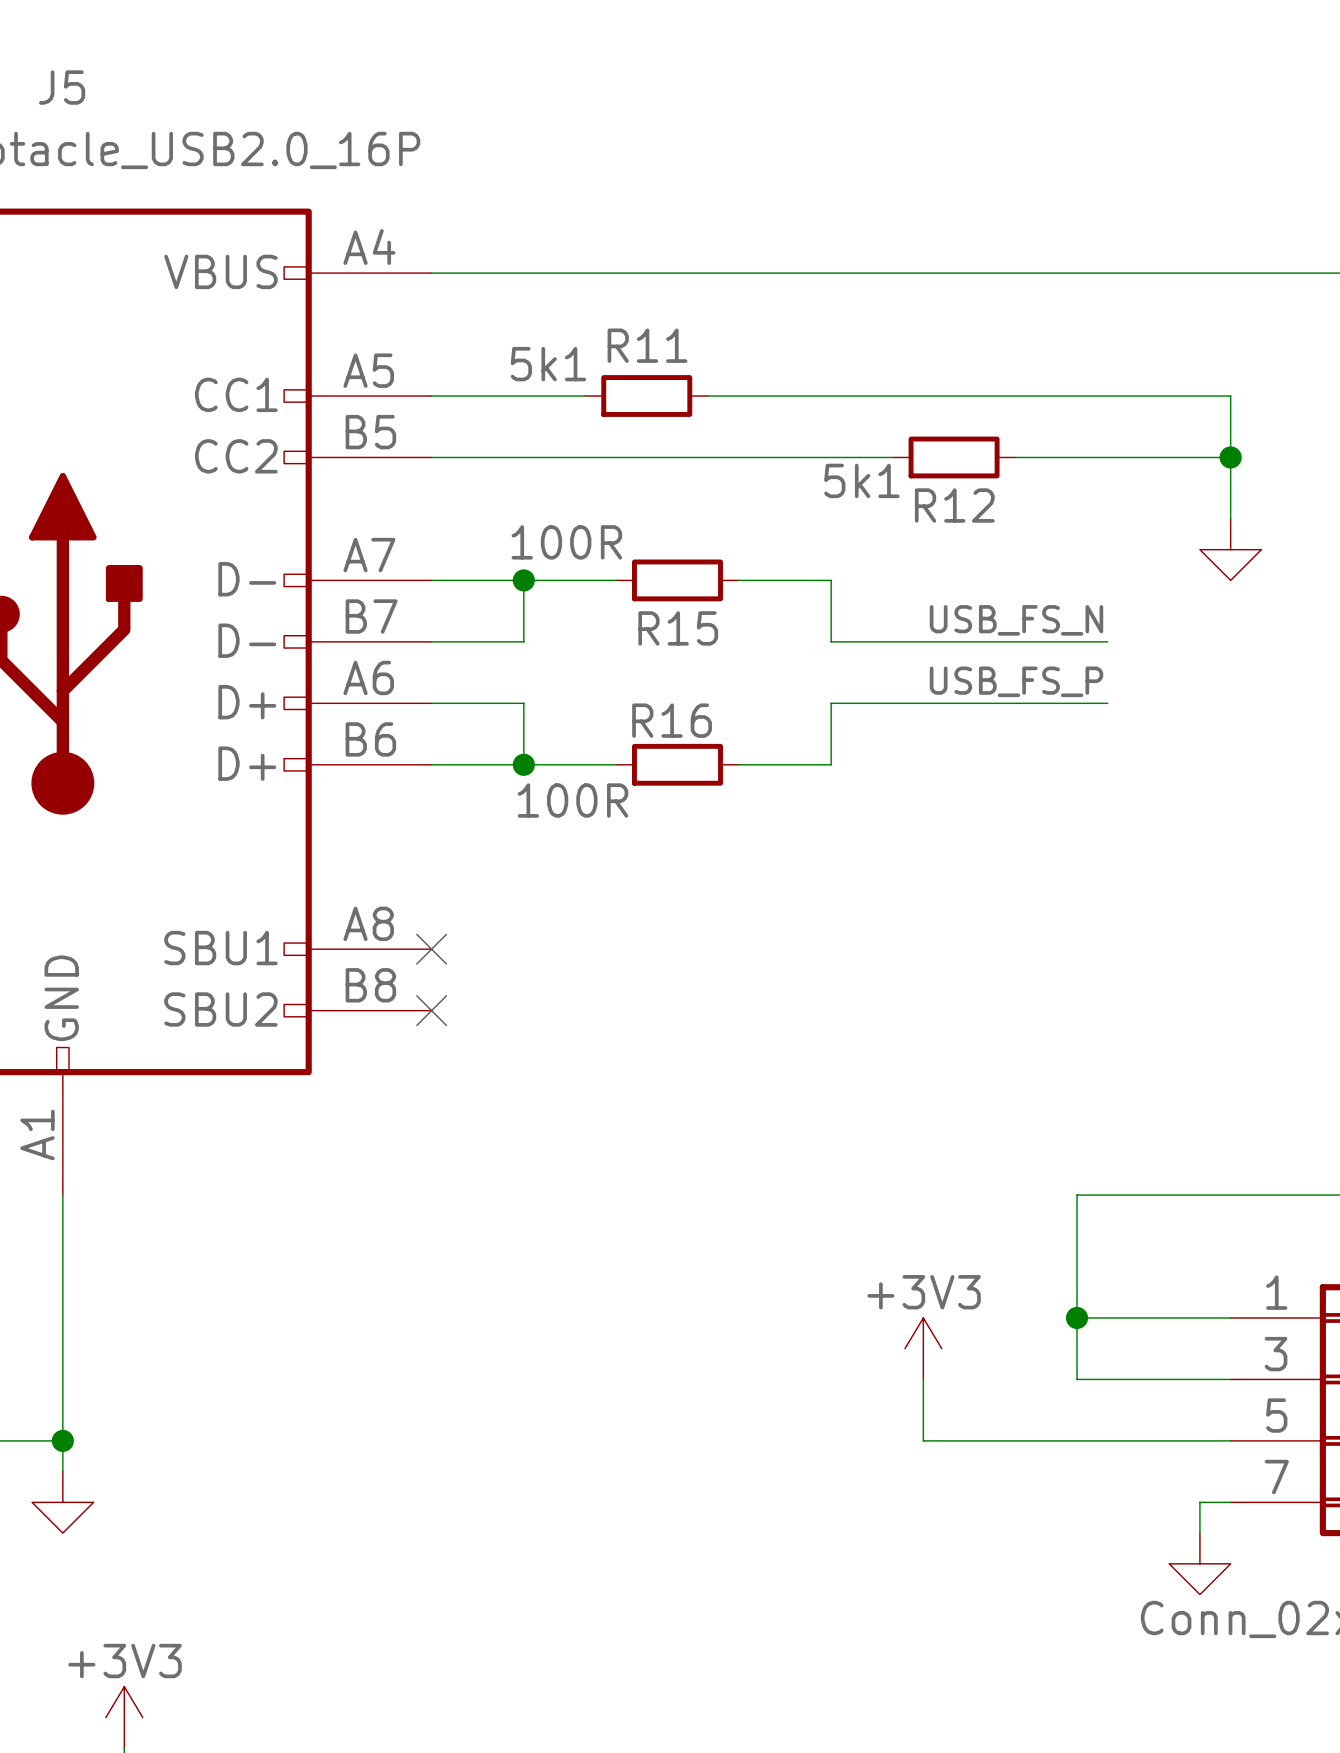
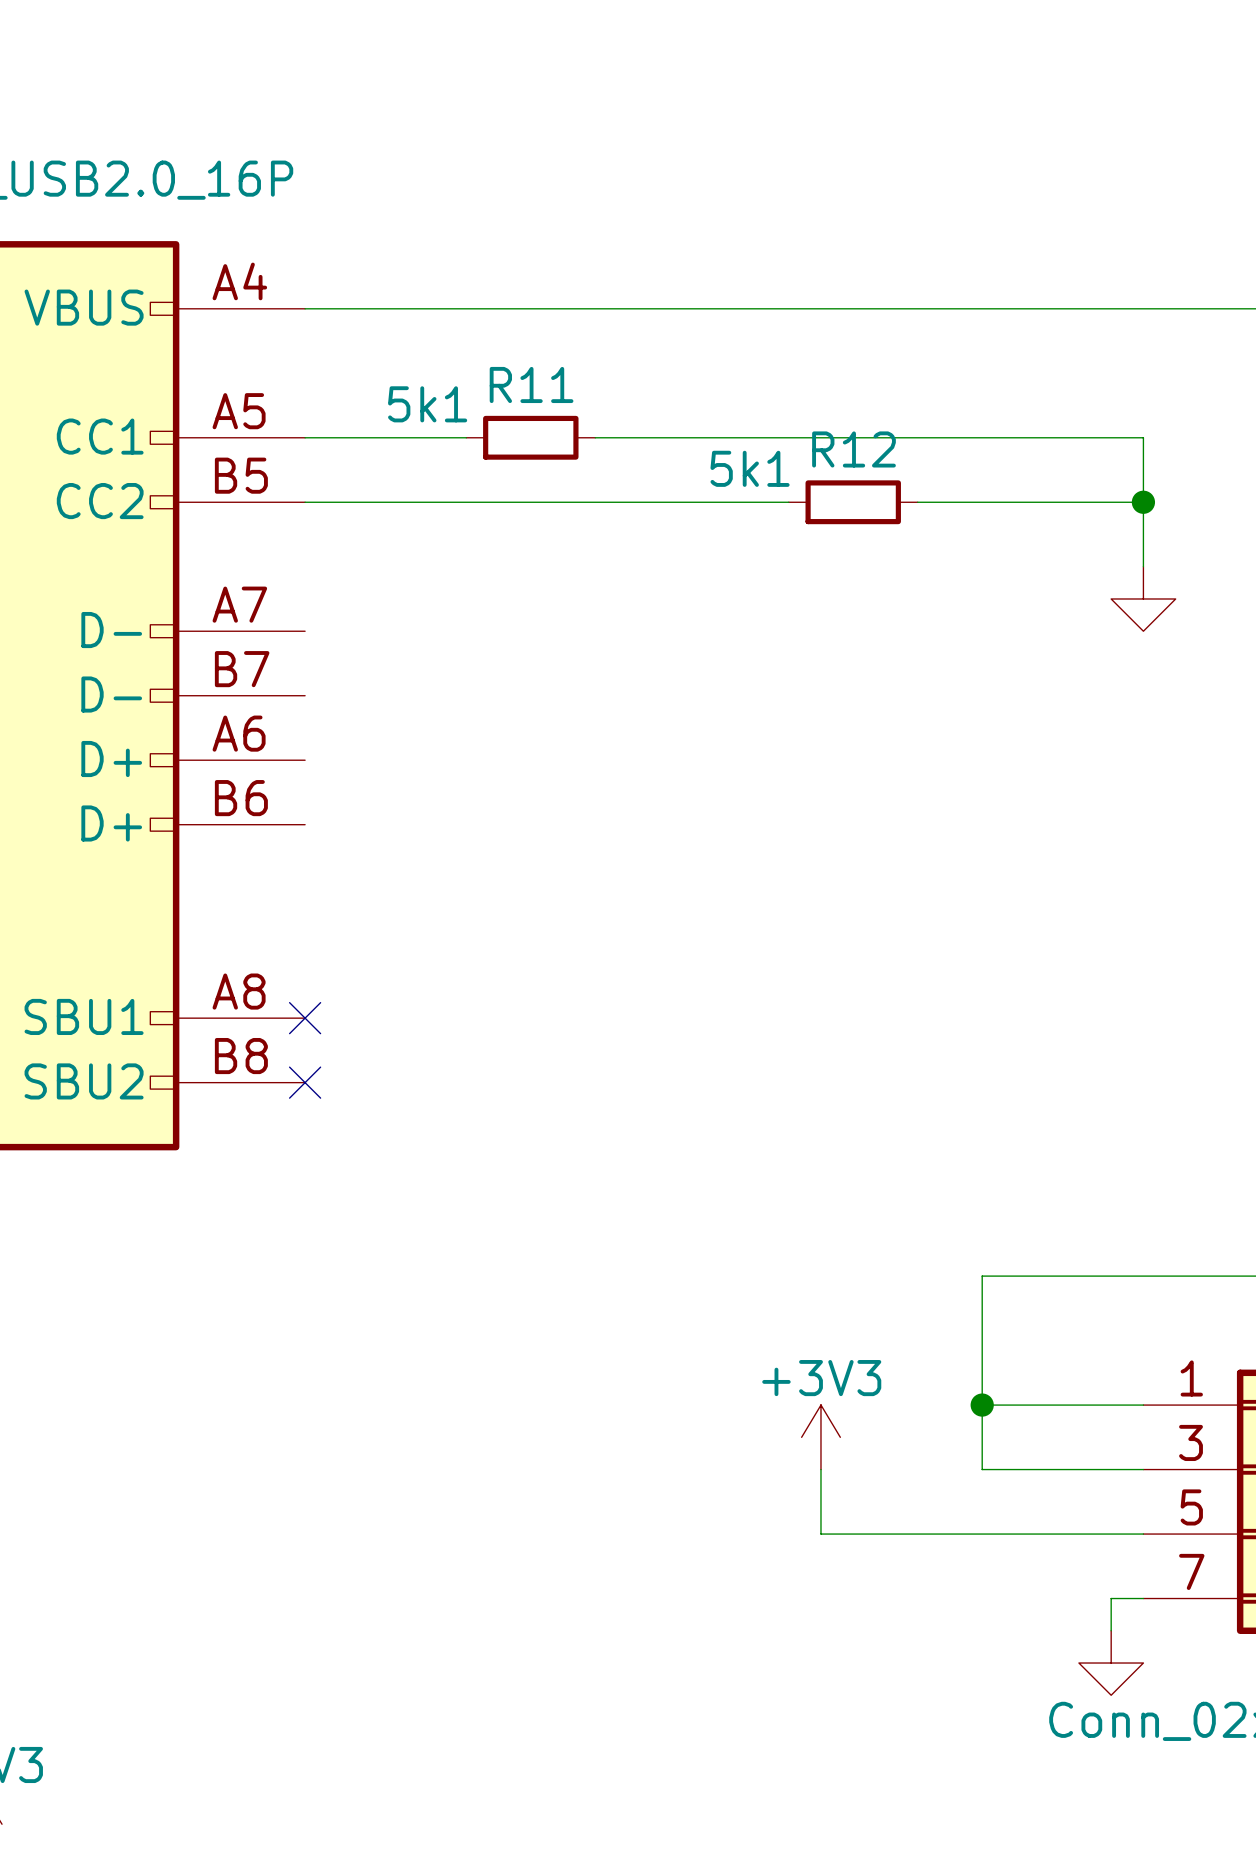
R12 value position: 5k1 (861, 480) -> 5k1 (750, 468)
R12 name position: R12 (954, 505) -> R12 (854, 449)
wire: (431, 580) (616, 580) -> none
wire: (523, 580) (523, 641) (431, 641) -> none
junction: (523, 580) -> none
R15: 100R (677, 580) -> none
wire: (738, 580) (831, 580) (831, 641) (1107, 641) -> none
label: USB_FS_N (1016, 620) -> none
label: USB_FS_P (1016, 681) -> none
wire: (431, 703) (523, 703) (523, 764) -> none
wire: (1107, 703) (831, 703) (831, 764) (738, 764) -> none
wire: (431, 764) (616, 764) -> none
junction: (523, 764) -> none
R16: 100R (677, 764) -> none

